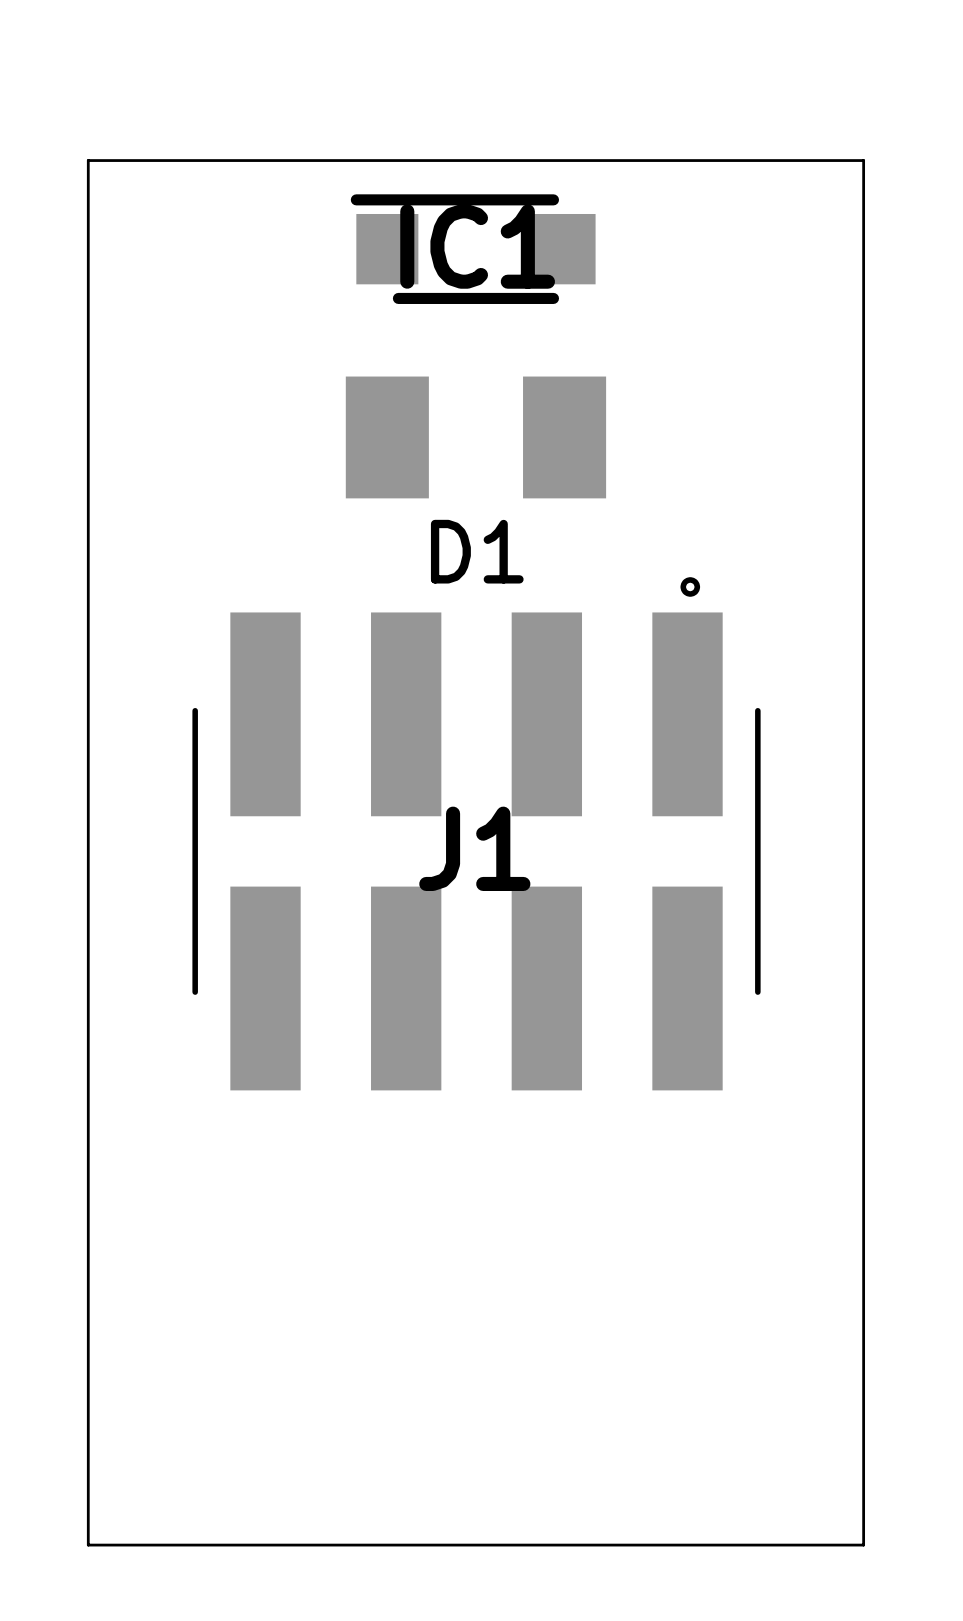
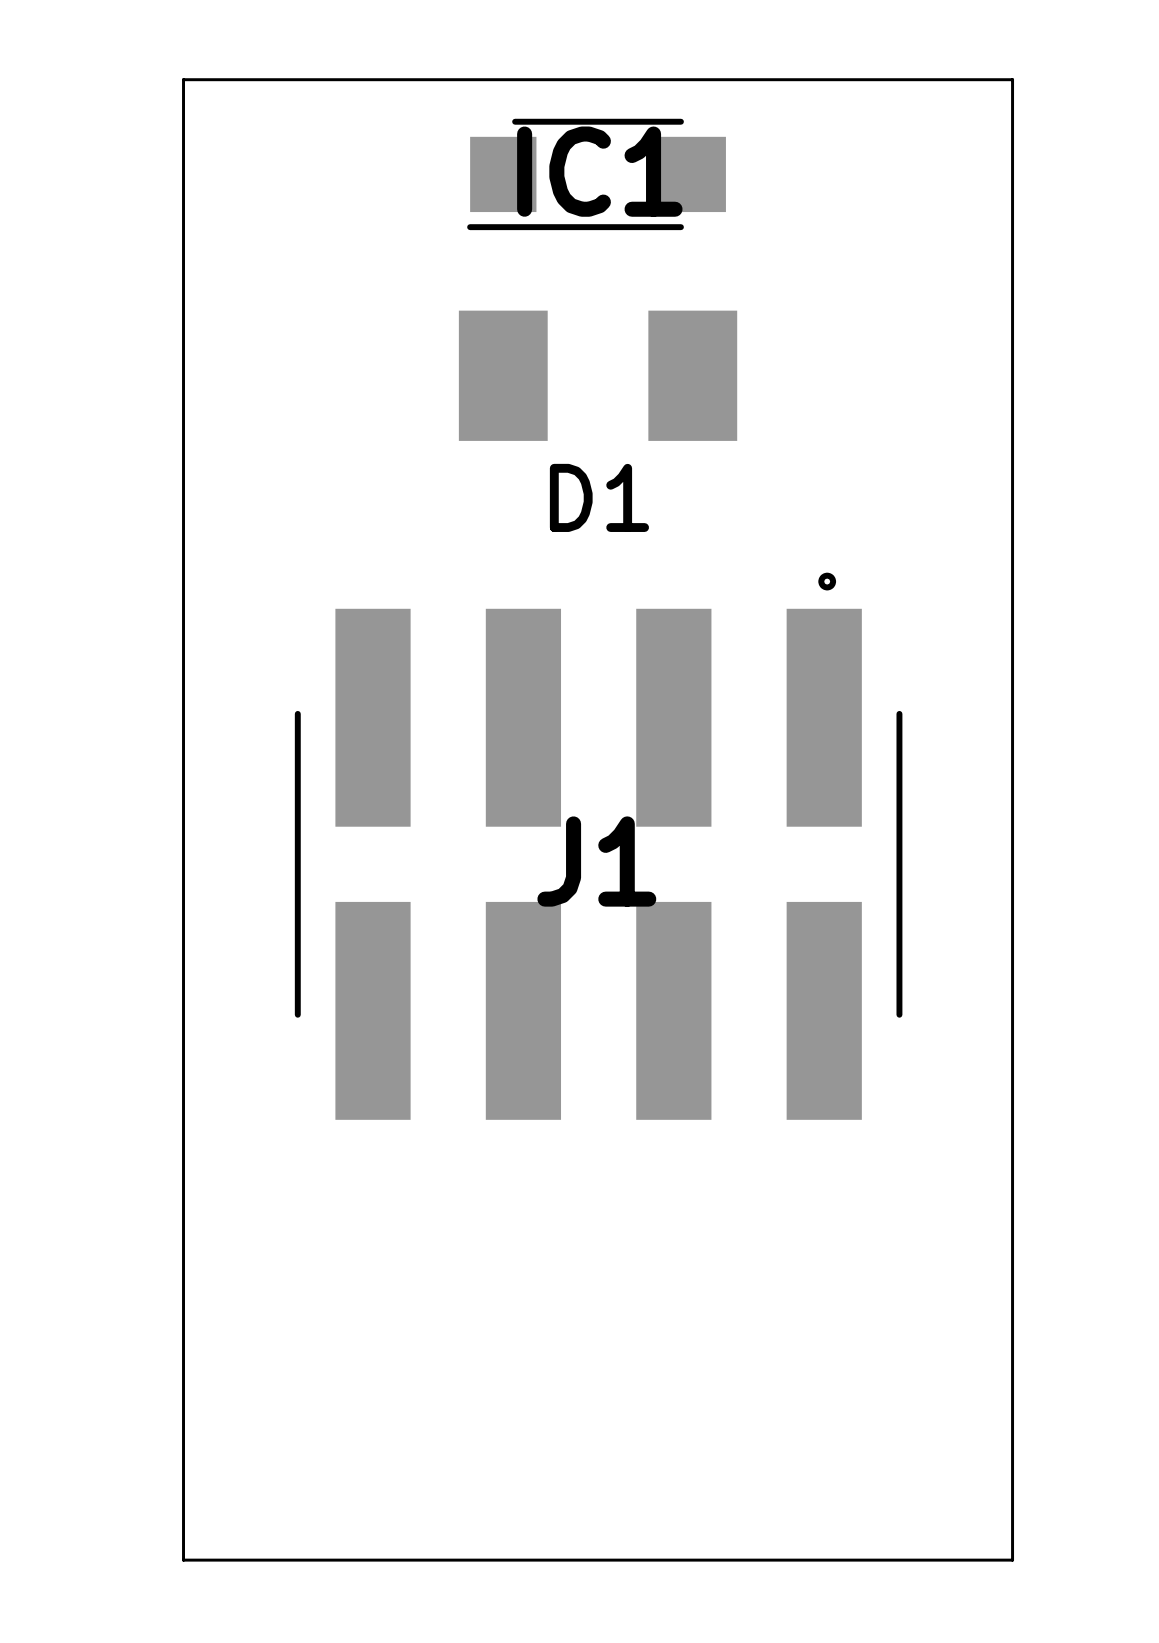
IC1 footprint: [350, 194, 596, 304] -> [467, 118, 726, 231]
J1 footprint: [192, 577, 761, 1091] -> [294, 572, 903, 1120]
J1 name position: J1 (474, 848) -> J1 (596, 861)

